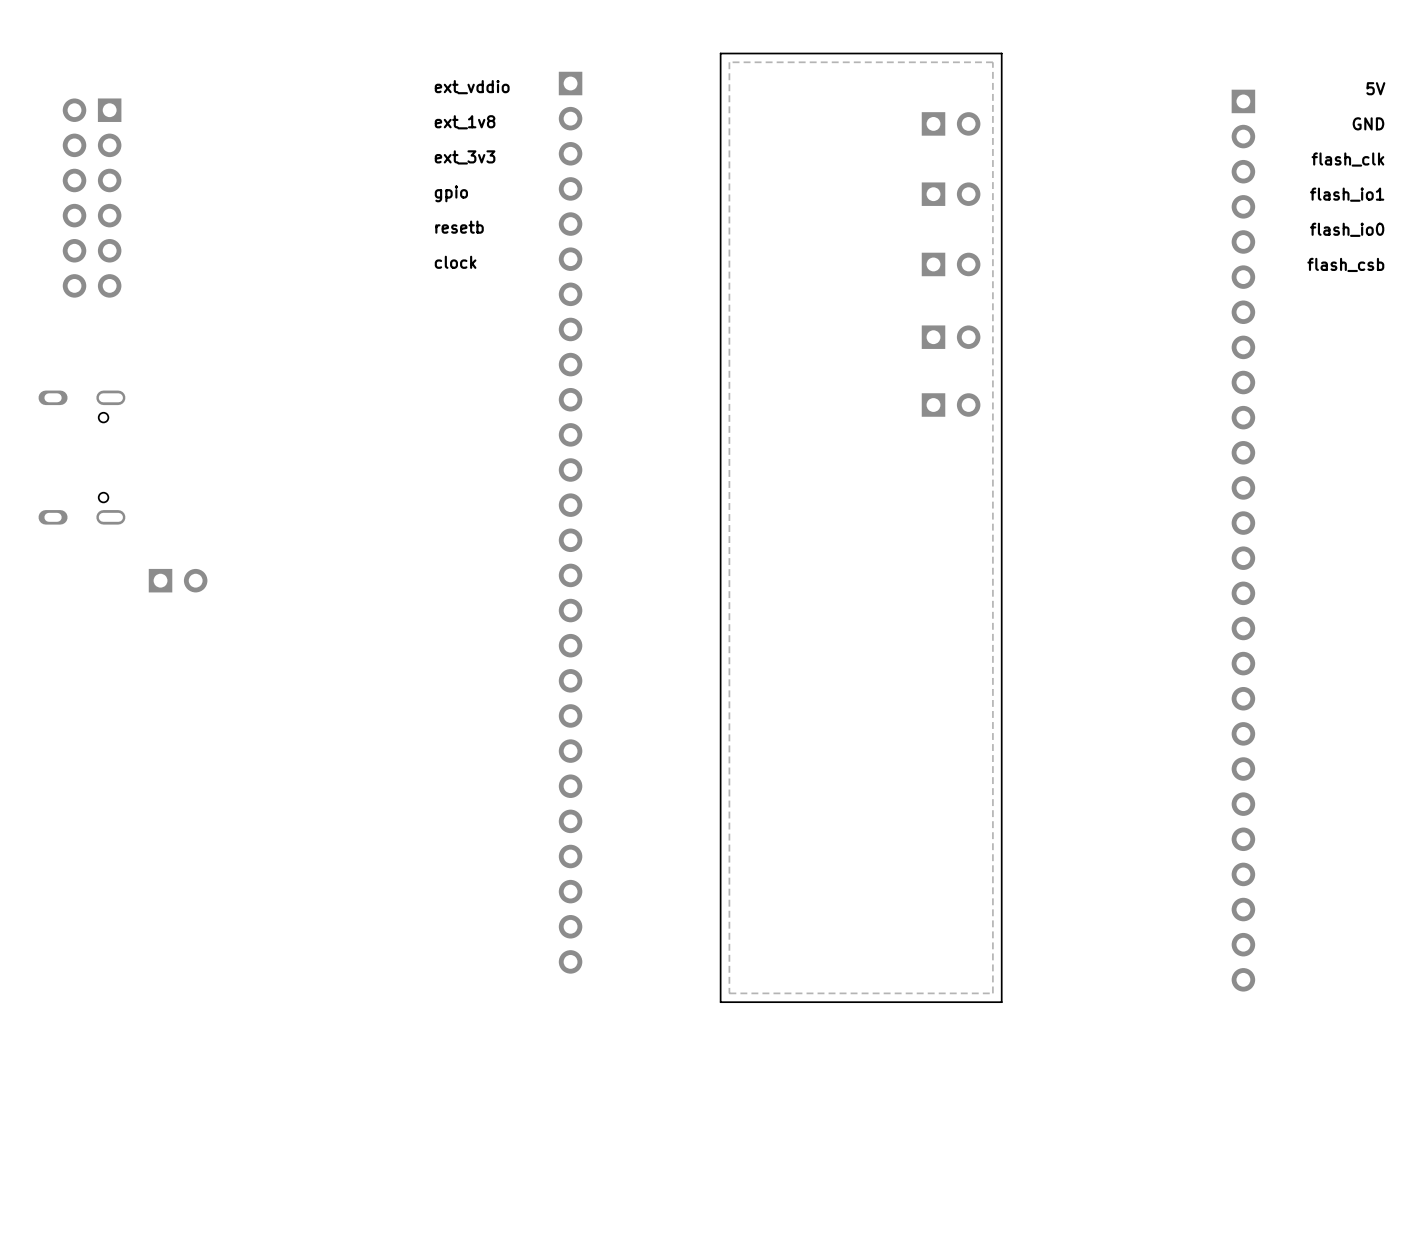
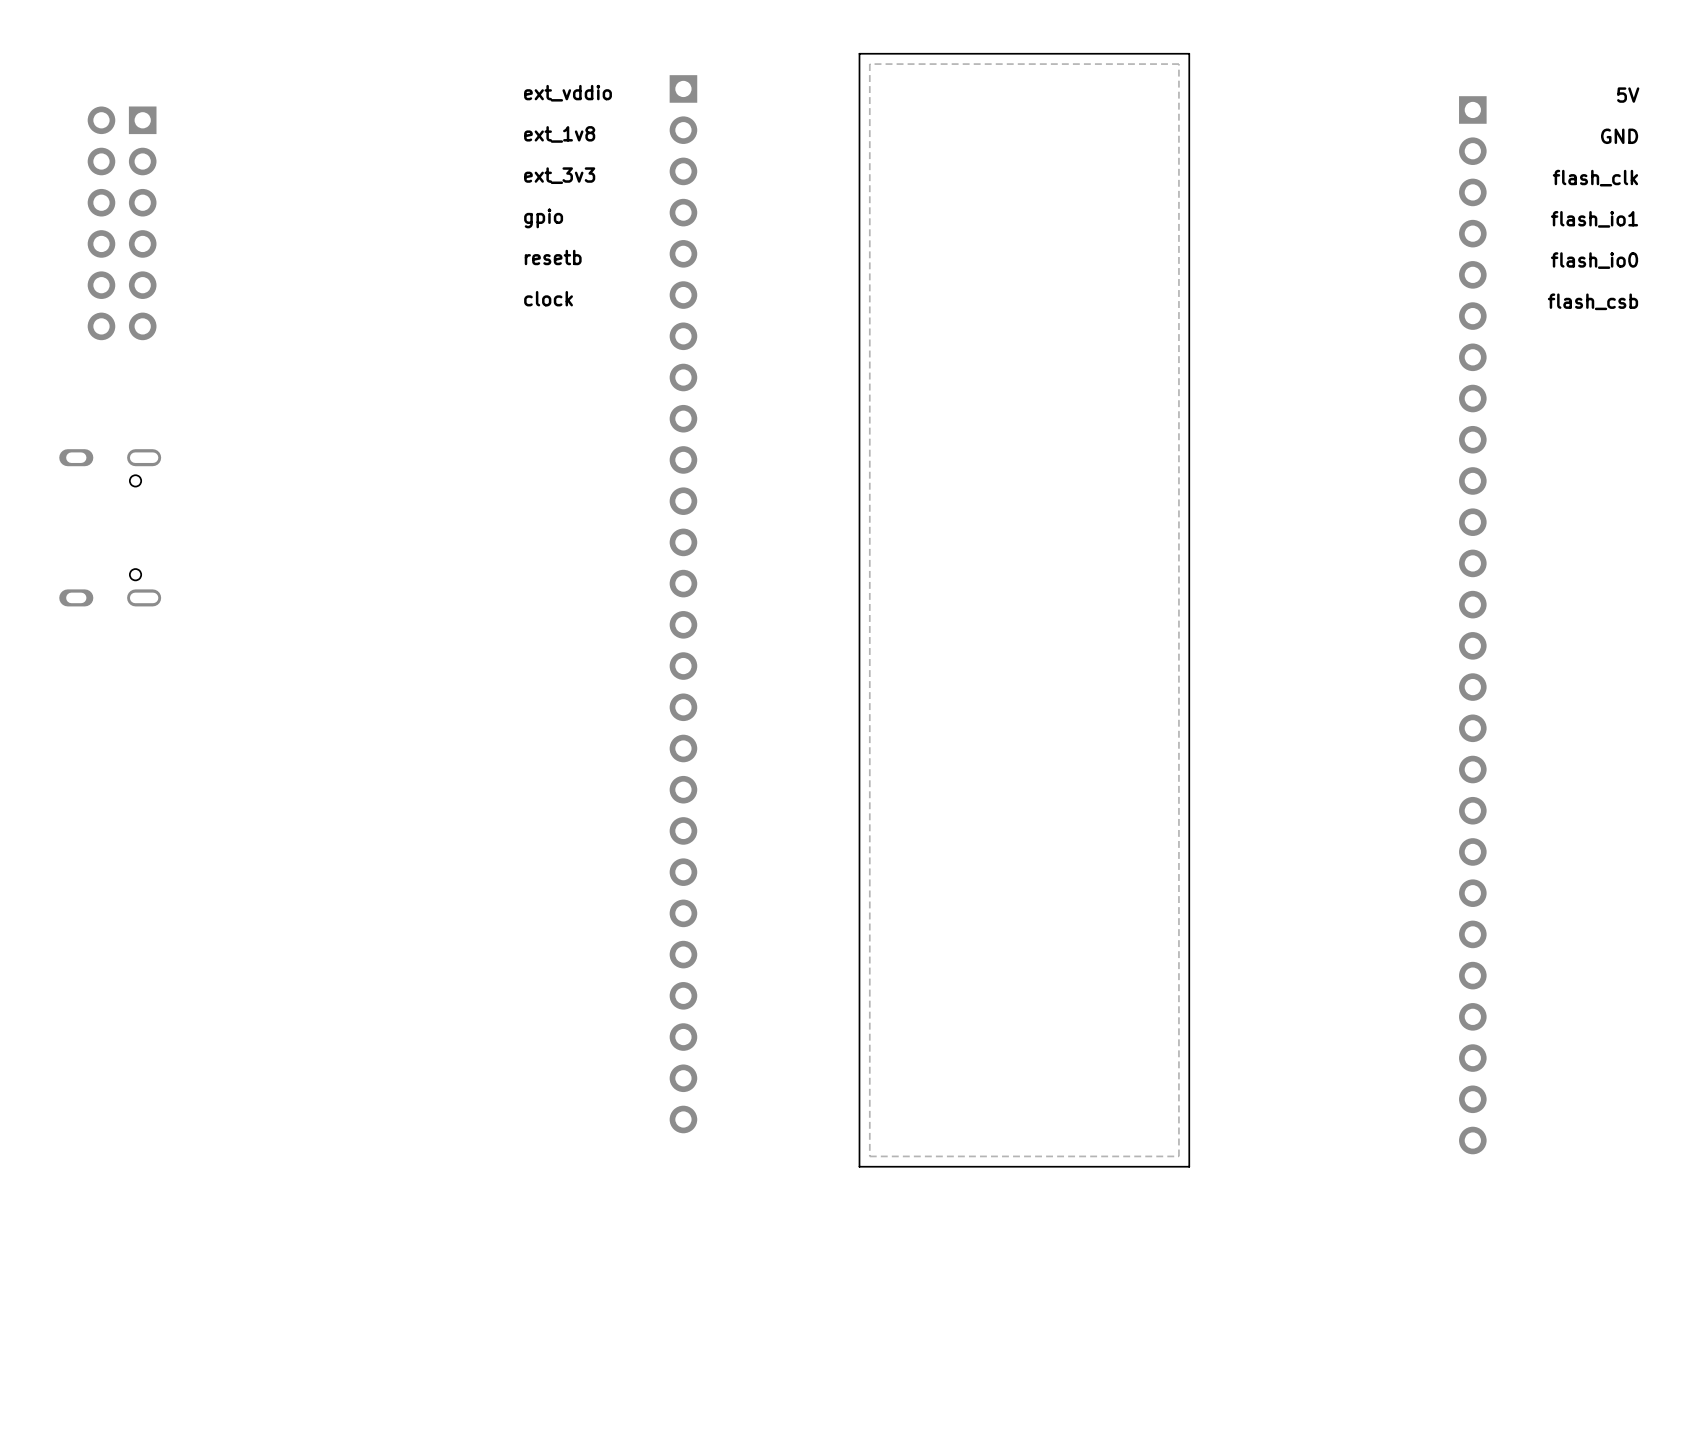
part: (951, 123) -> none
part: (951, 194) -> none
part: (951, 264) -> none
part: (951, 337) -> none
part: (951, 405) -> none
part: (178, 580) -> none

